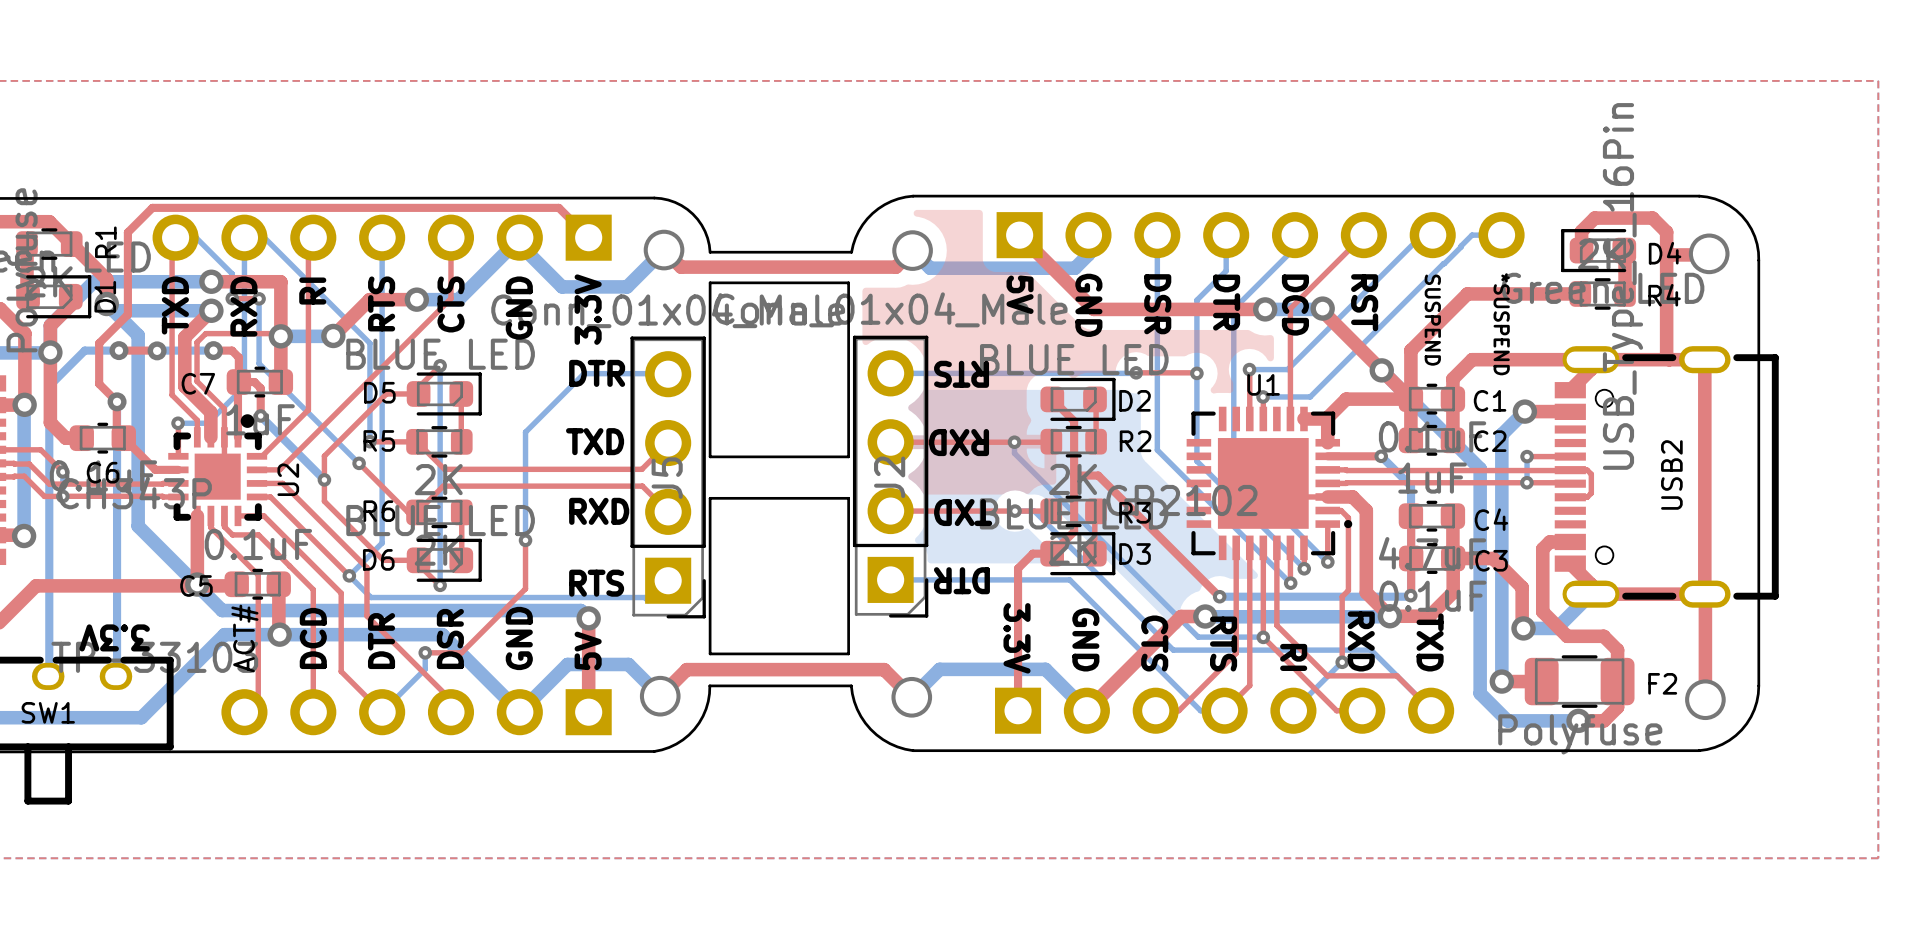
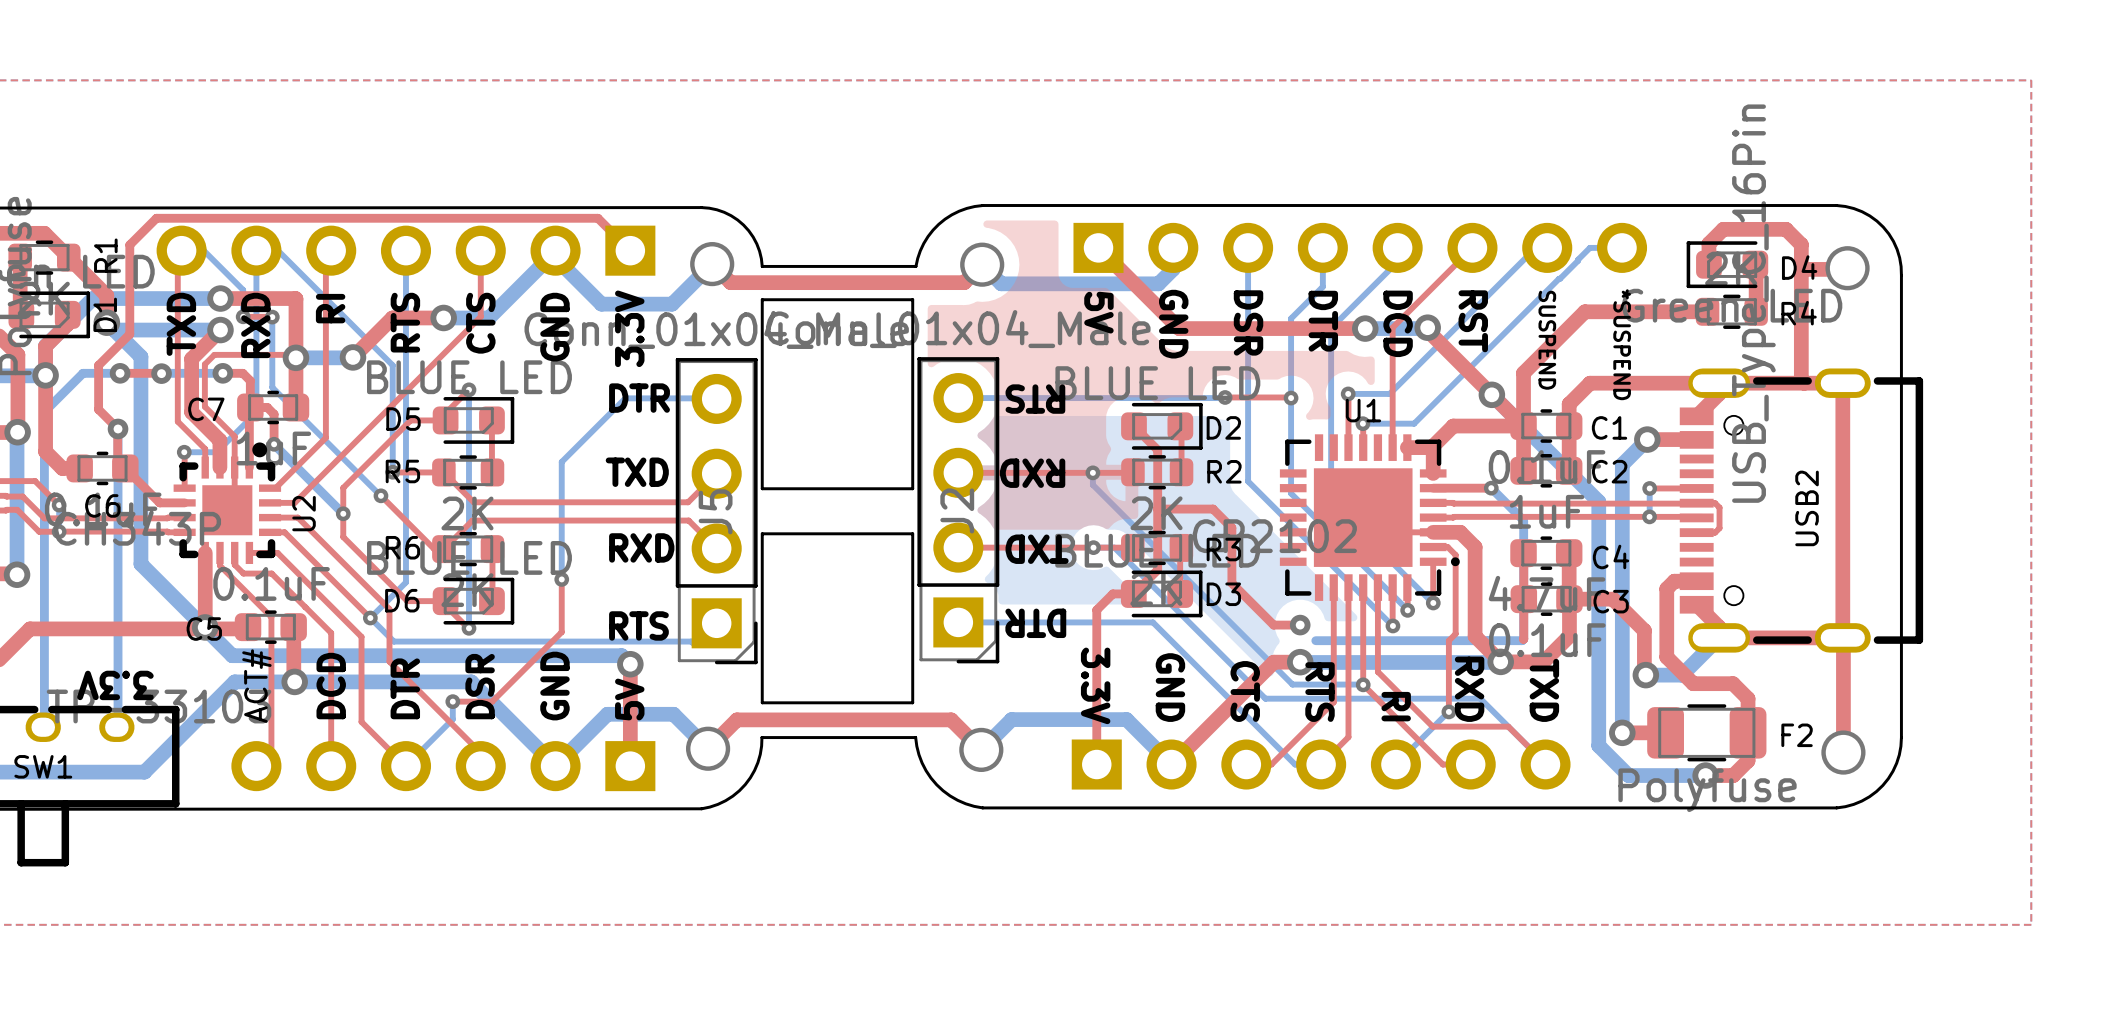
top track: (1098, 475) (1219, 596) -> (1183, 509) (1213, 509) (1231, 527) (1231, 583) (1273, 625) (1300, 625)
via: (1410, 595) -> none
via position: (1219, 596) -> (1300, 625)

